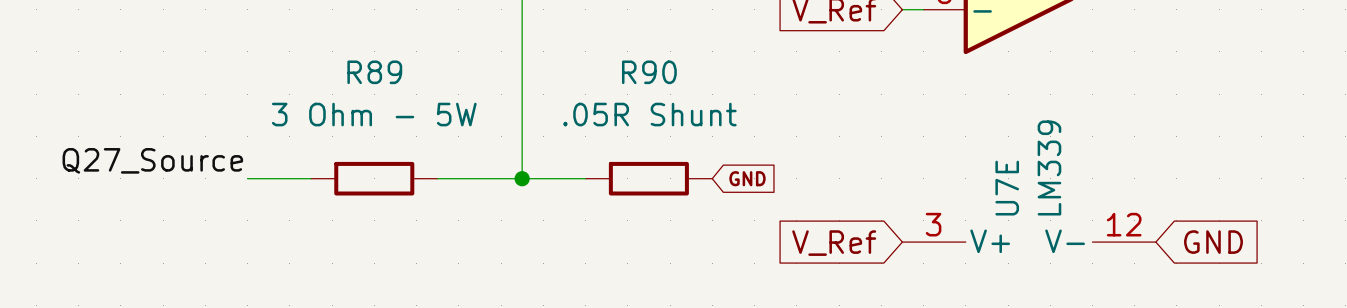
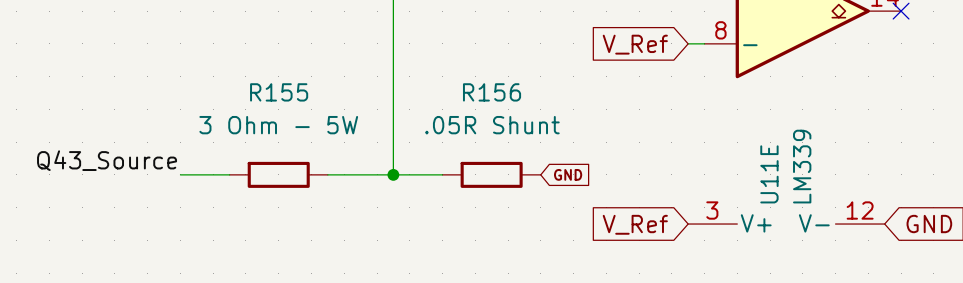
R89 name: R89 (374, 72) -> R155 (279, 92)
R90 name: R90 (649, 72) -> R156 (492, 92)
label: Q27_Source (152, 160) -> Q43_Source (107, 160)
U7E name: U7E (1007, 188) -> U11E (769, 174)

